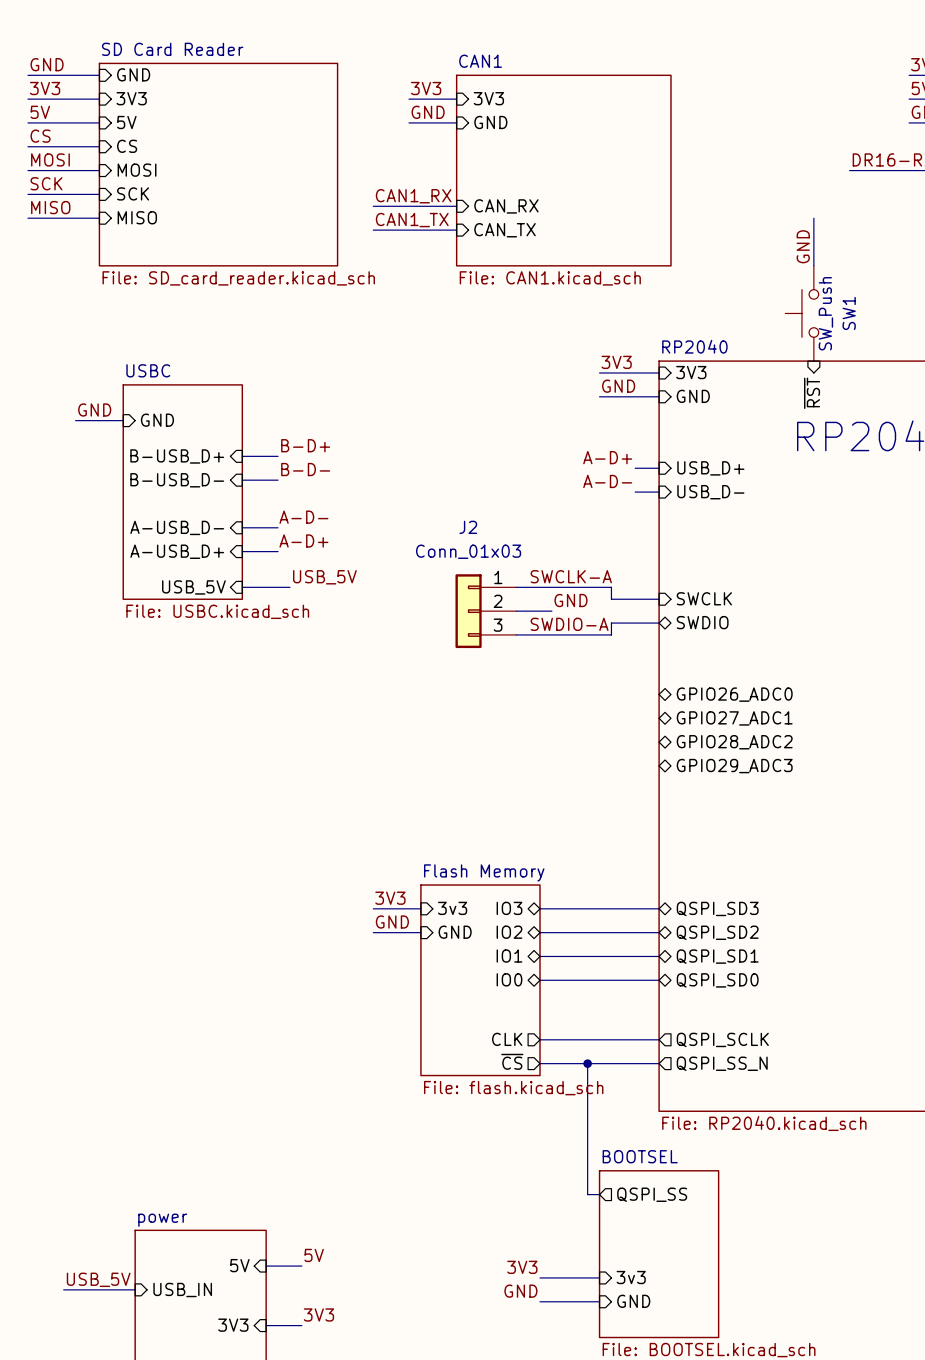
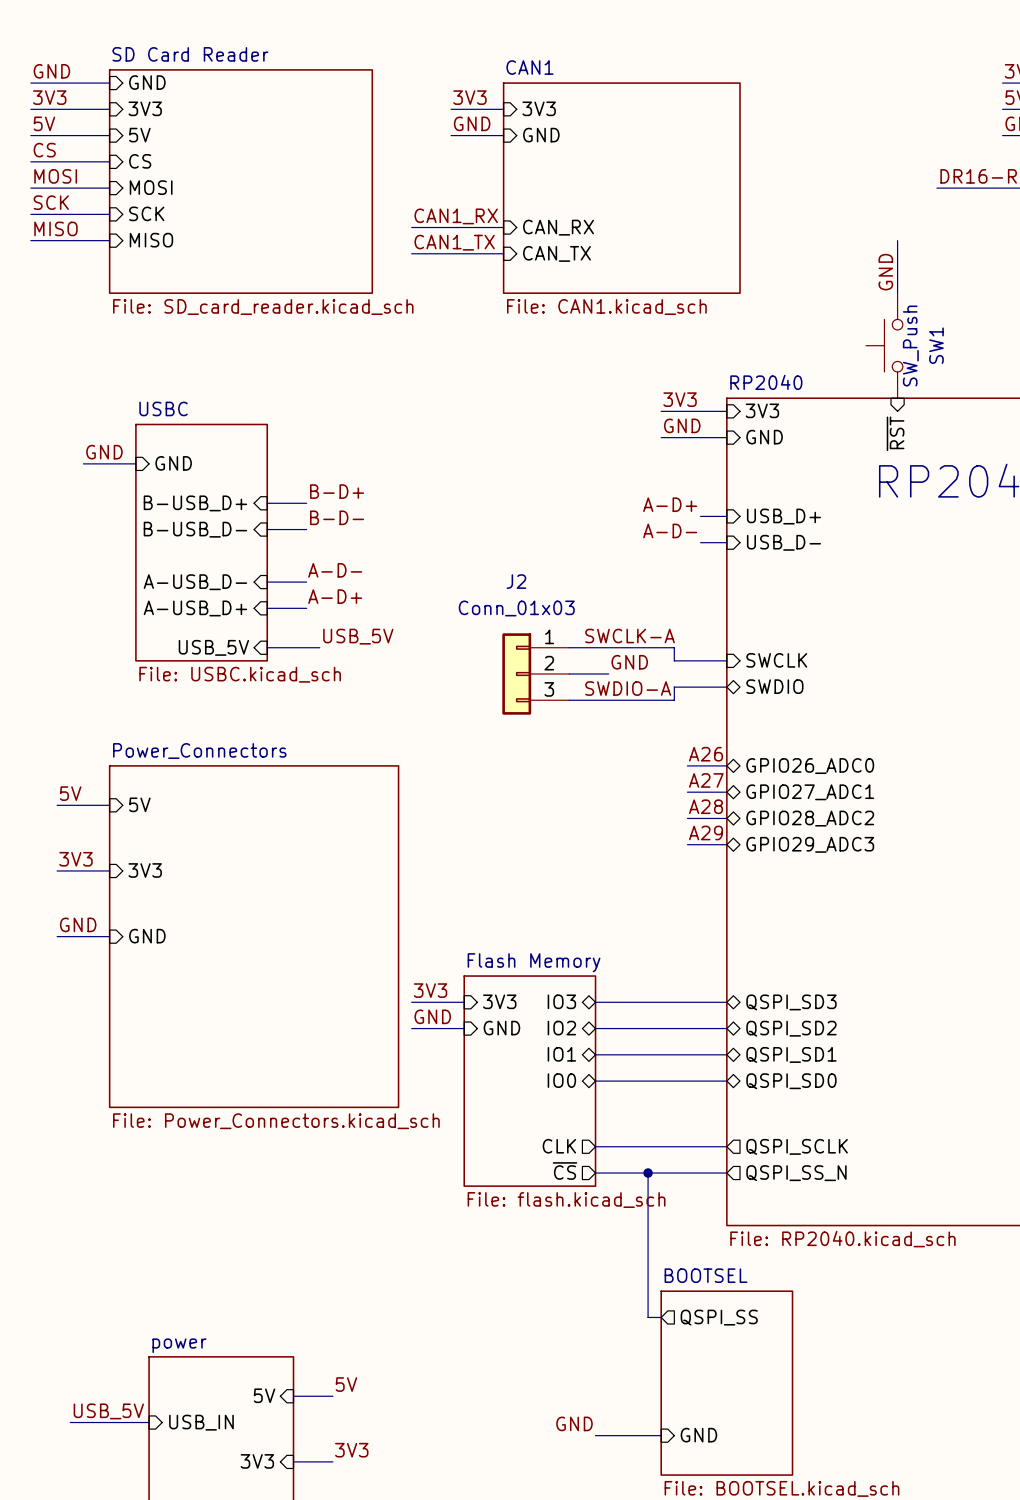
label: none -> A26 (706, 754)
wire: none -> (687, 765) (726, 765)
label: none -> A27 (706, 780)
wire: none -> (687, 792) (726, 792)
label: none -> 5V (70, 793)
sheet pin: none -> 5V (139, 804)
wire: none -> (57, 805) (109, 805)
label: none -> A28 (706, 806)
wire: none -> (687, 818) (726, 818)
label: none -> A29 (706, 832)
wire: none -> (687, 844) (726, 844)
label: none -> 3V3 (75, 859)
wire: none -> (57, 870) (109, 870)
sheet pin: none -> 3V3 (145, 870)
label: none -> GND (78, 924)
sheet pin: none -> GND (147, 936)
wire: none -> (57, 936) (109, 936)
sheet Power_Connectors: none -> File: Power_Connectors.kicad_sch (254, 936)
sheet pin: 3v3 (452, 908) -> 3V3 (499, 1001)
label: 3V3 (522, 1267) -> none
wire: (540, 1277) (599, 1277) -> none
sheet pin: 3v3 (631, 1277) -> none

